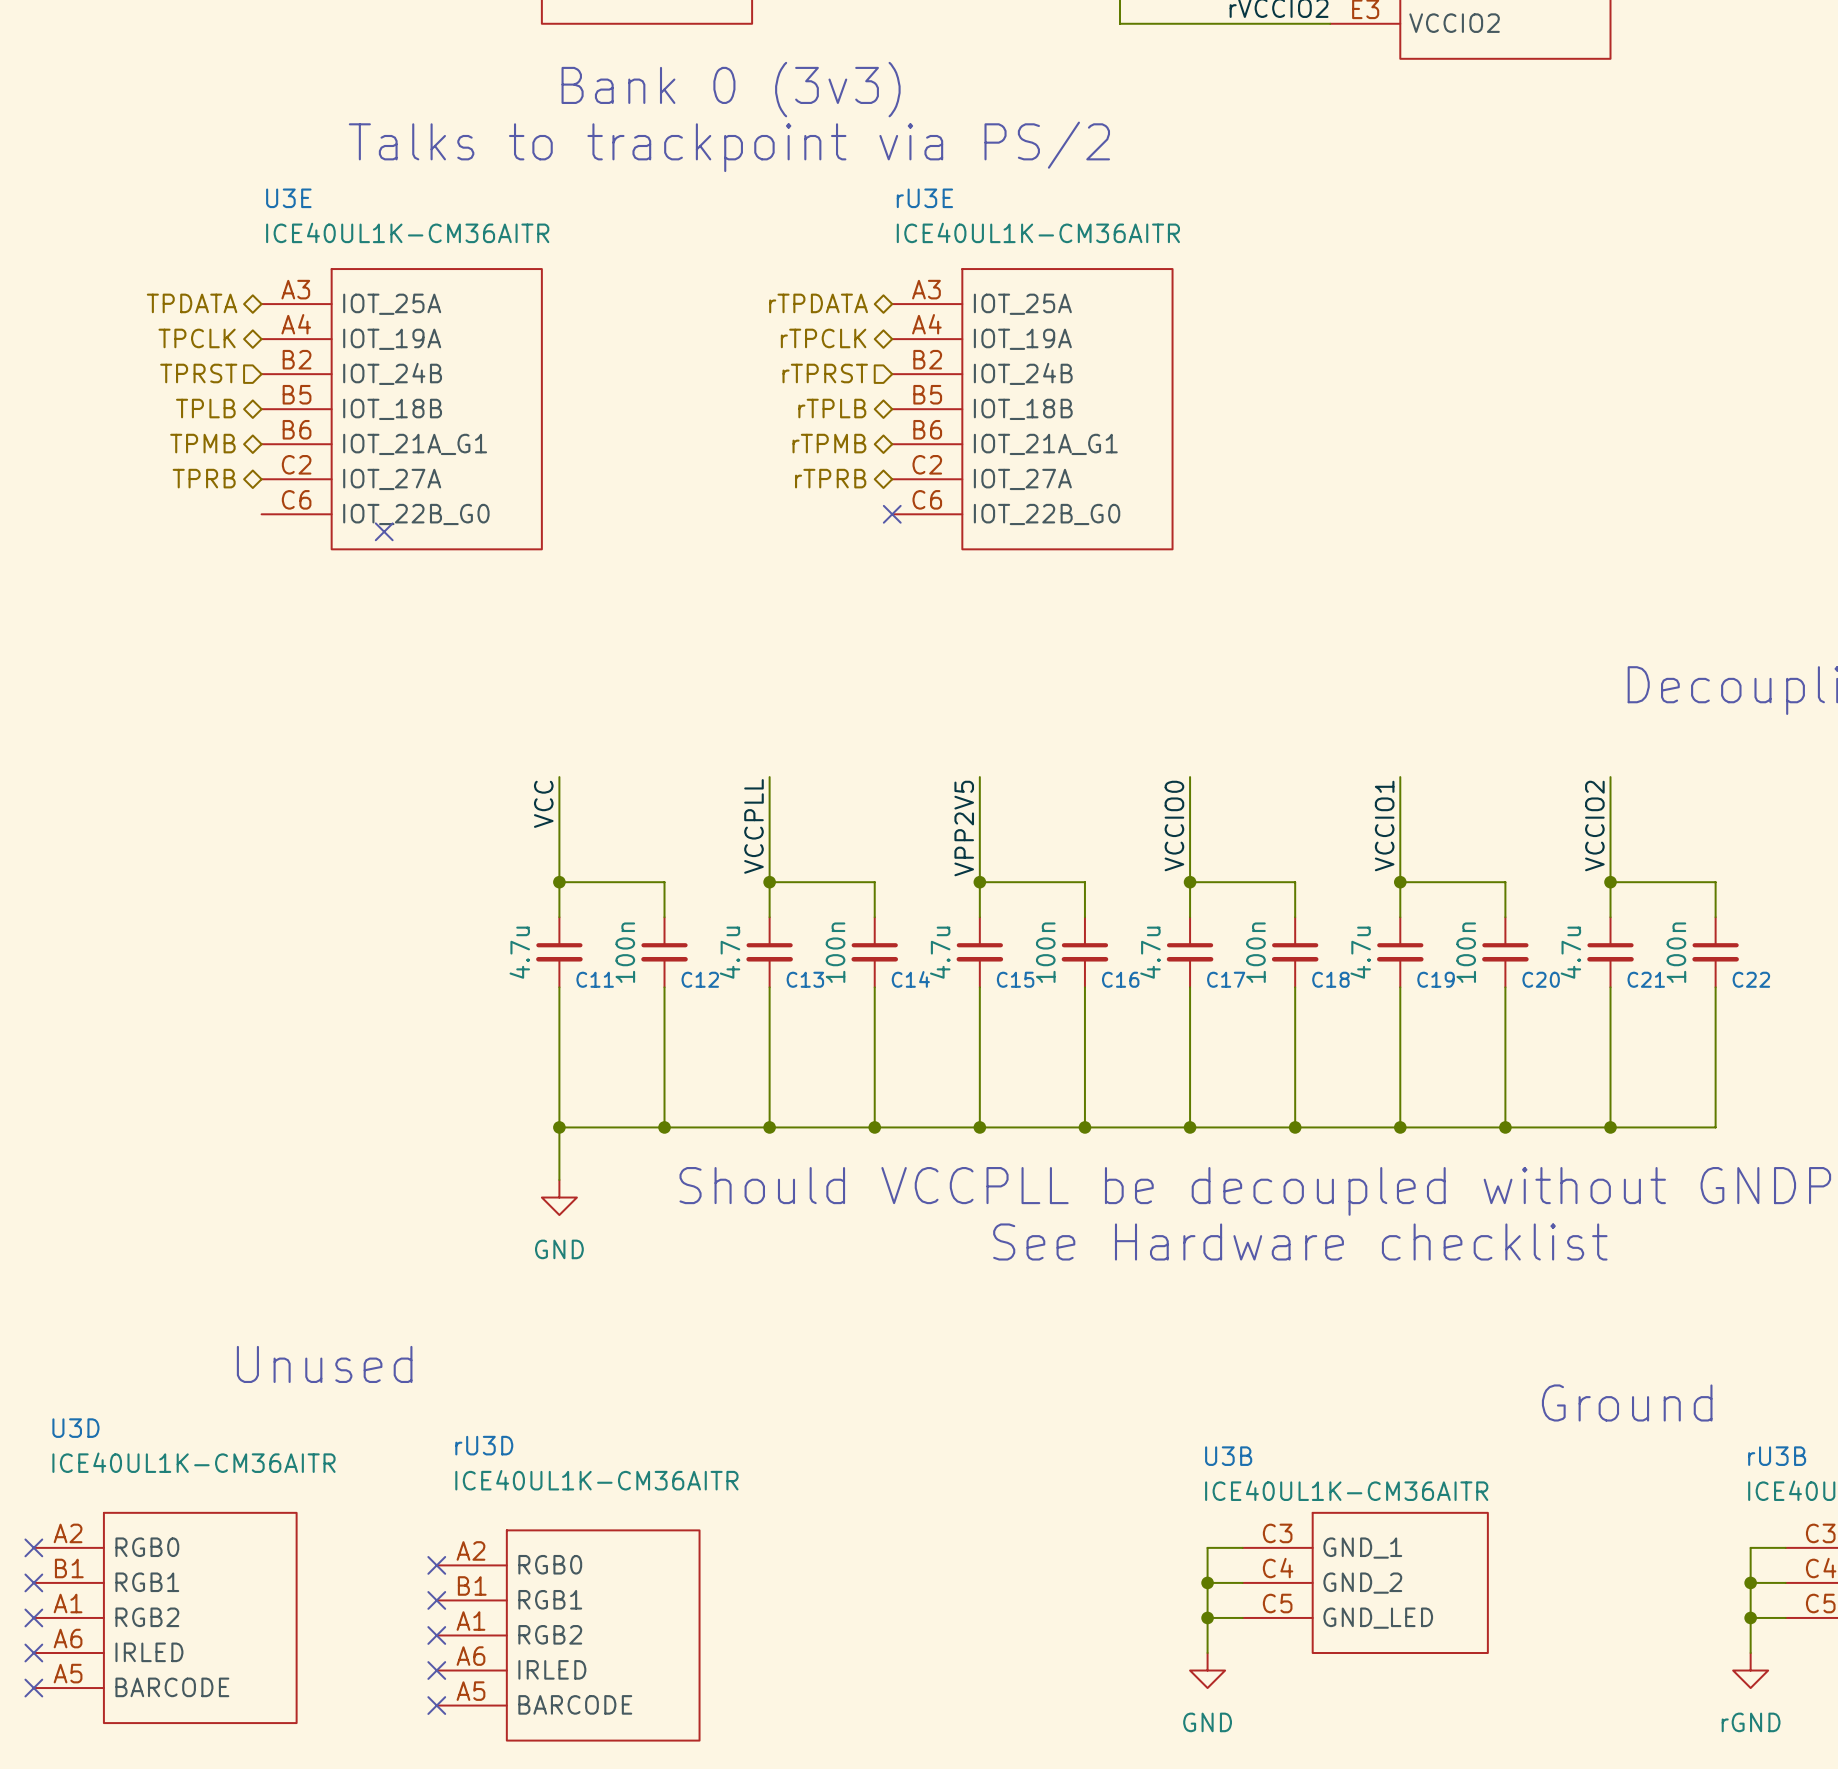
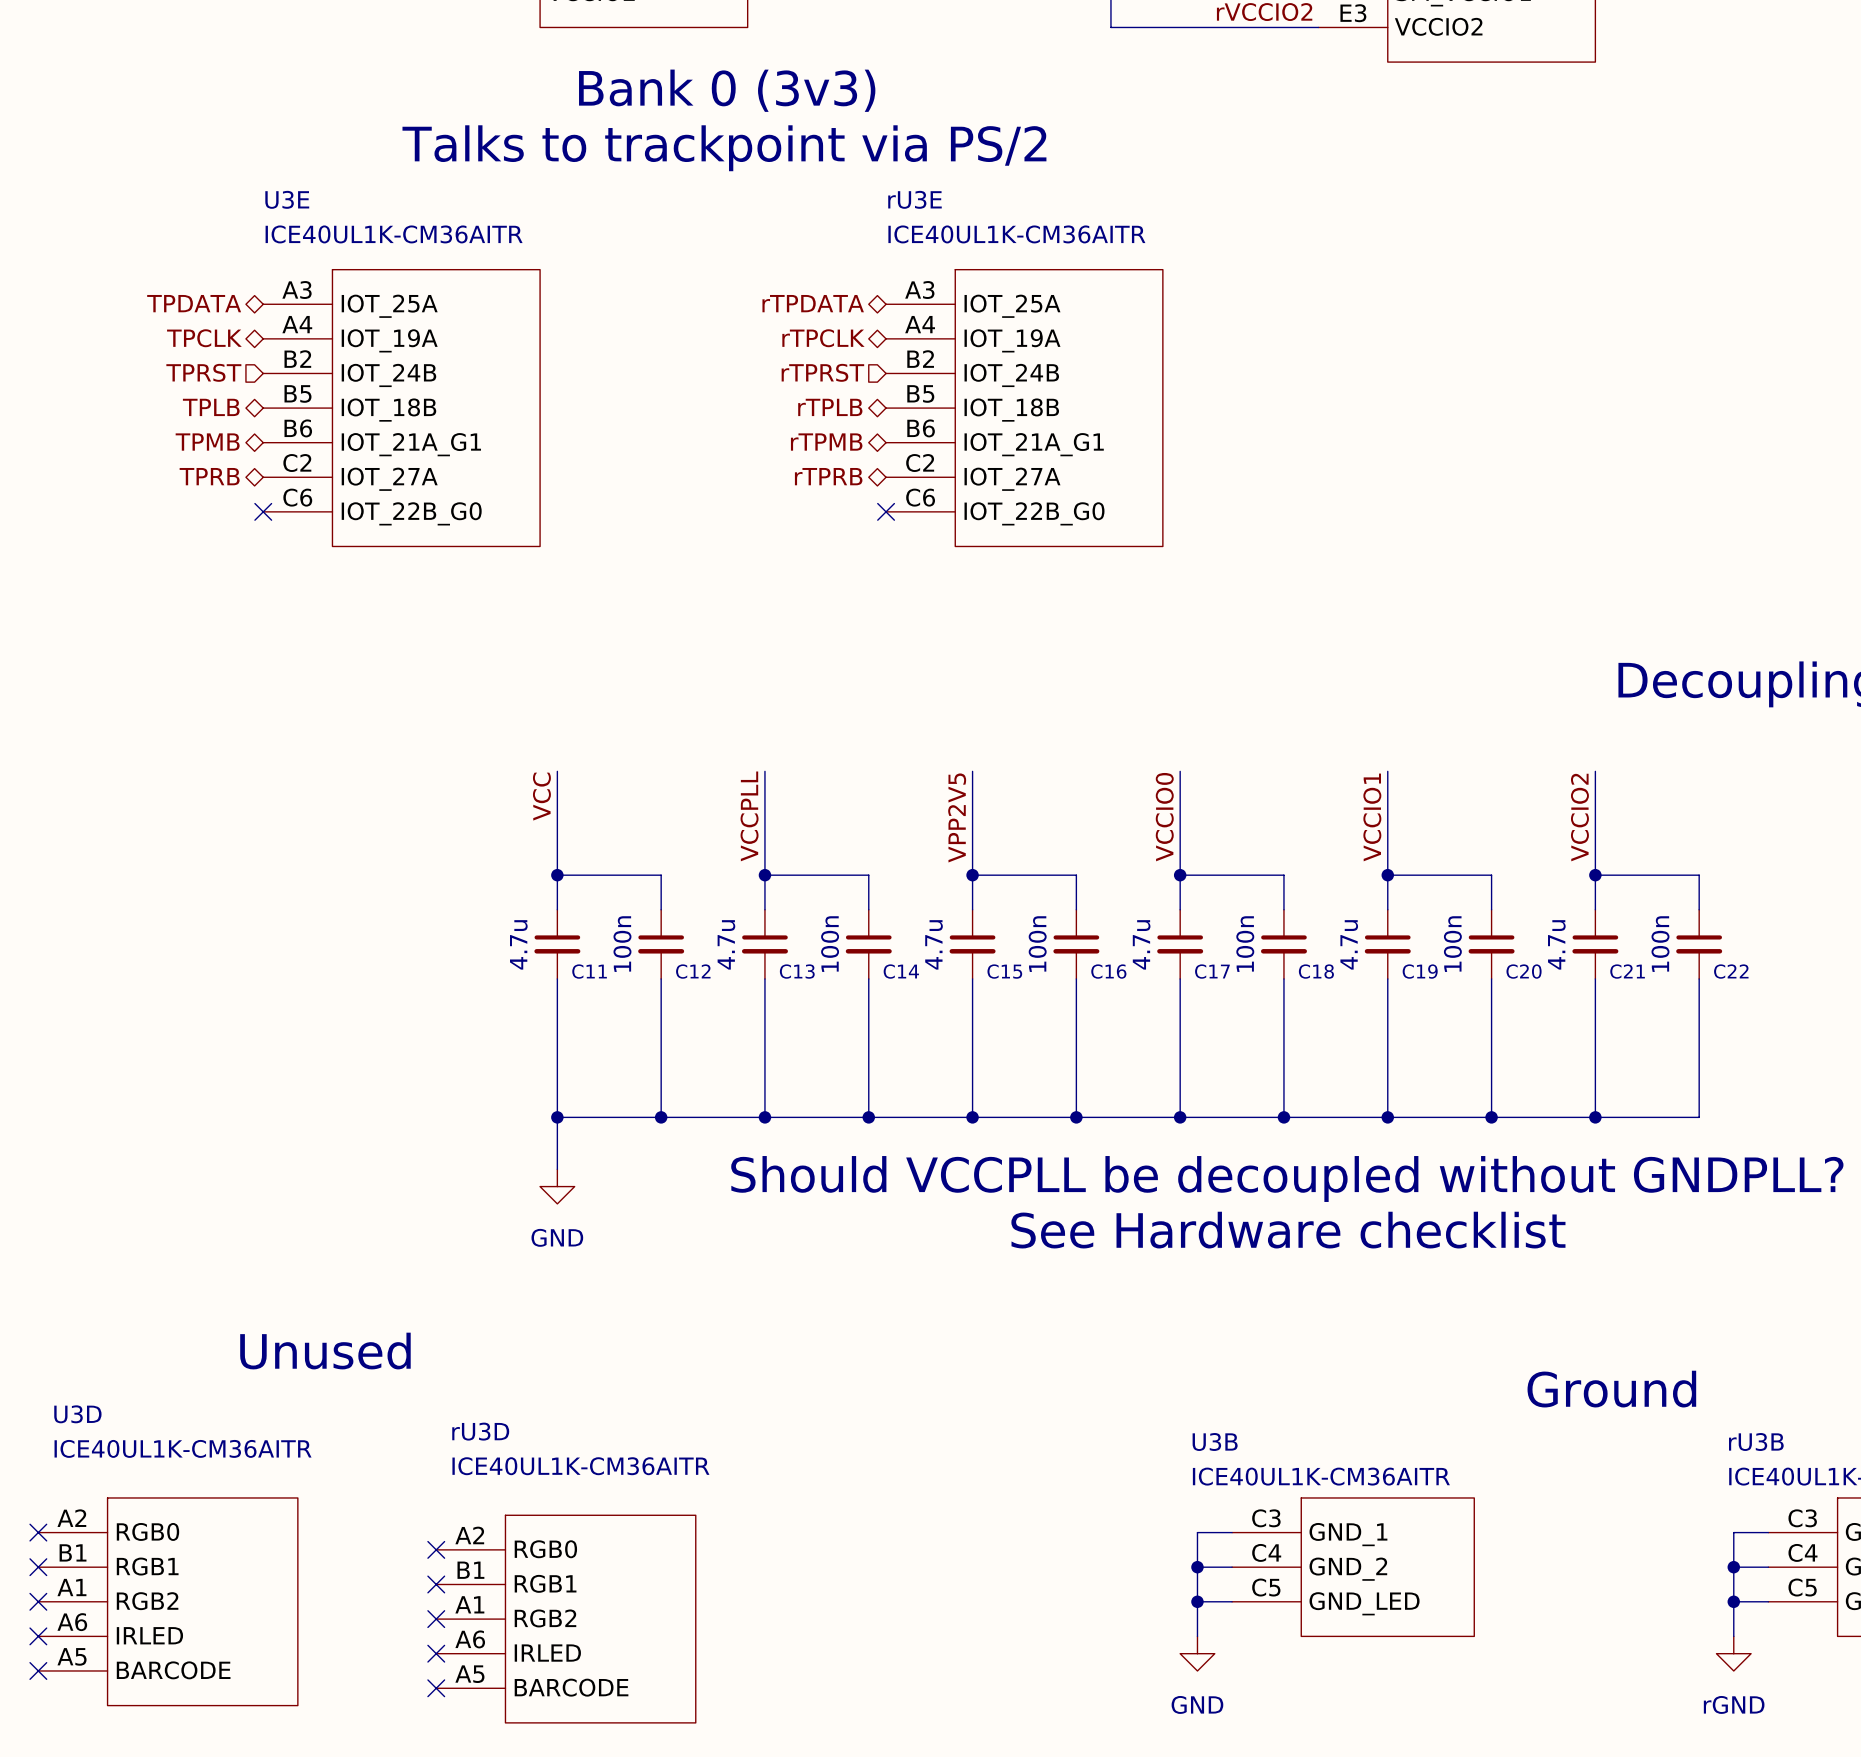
no-connect mark: none -> (263, 511)
no-connect mark: (384, 531) -> none

